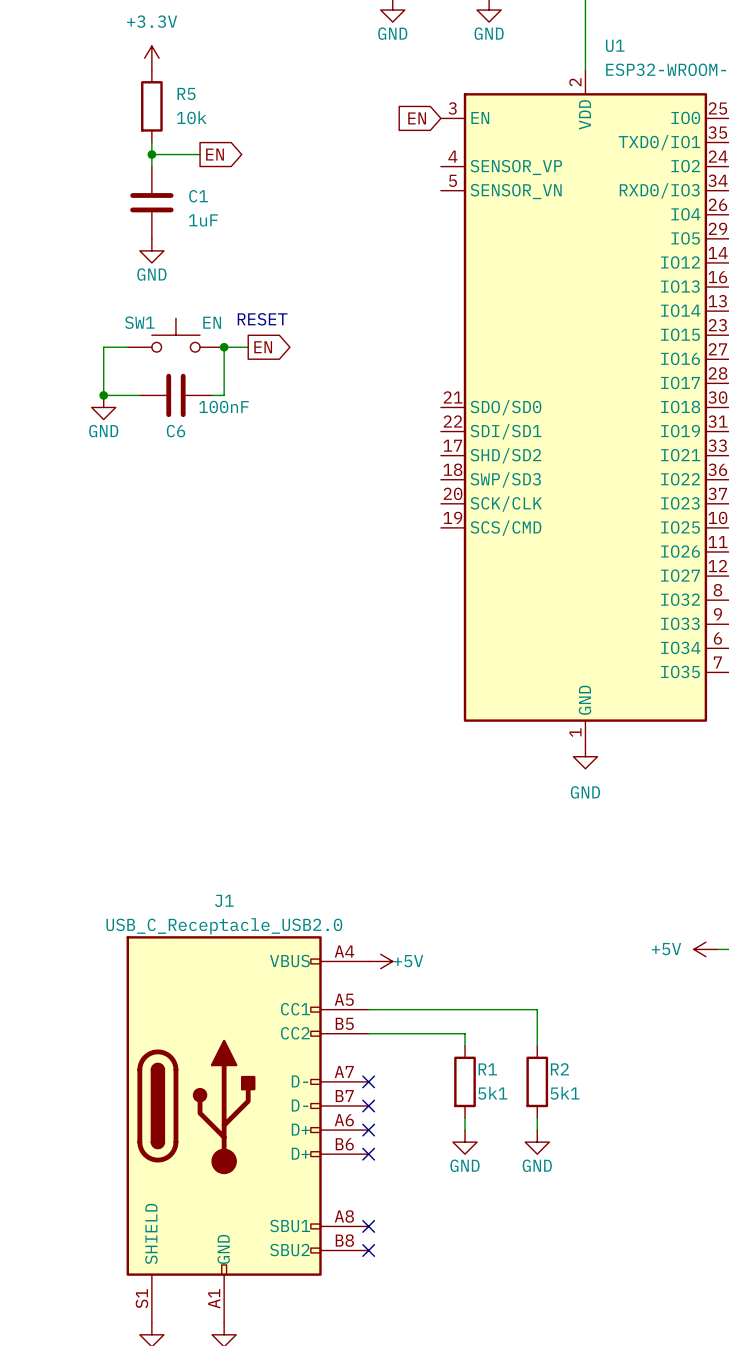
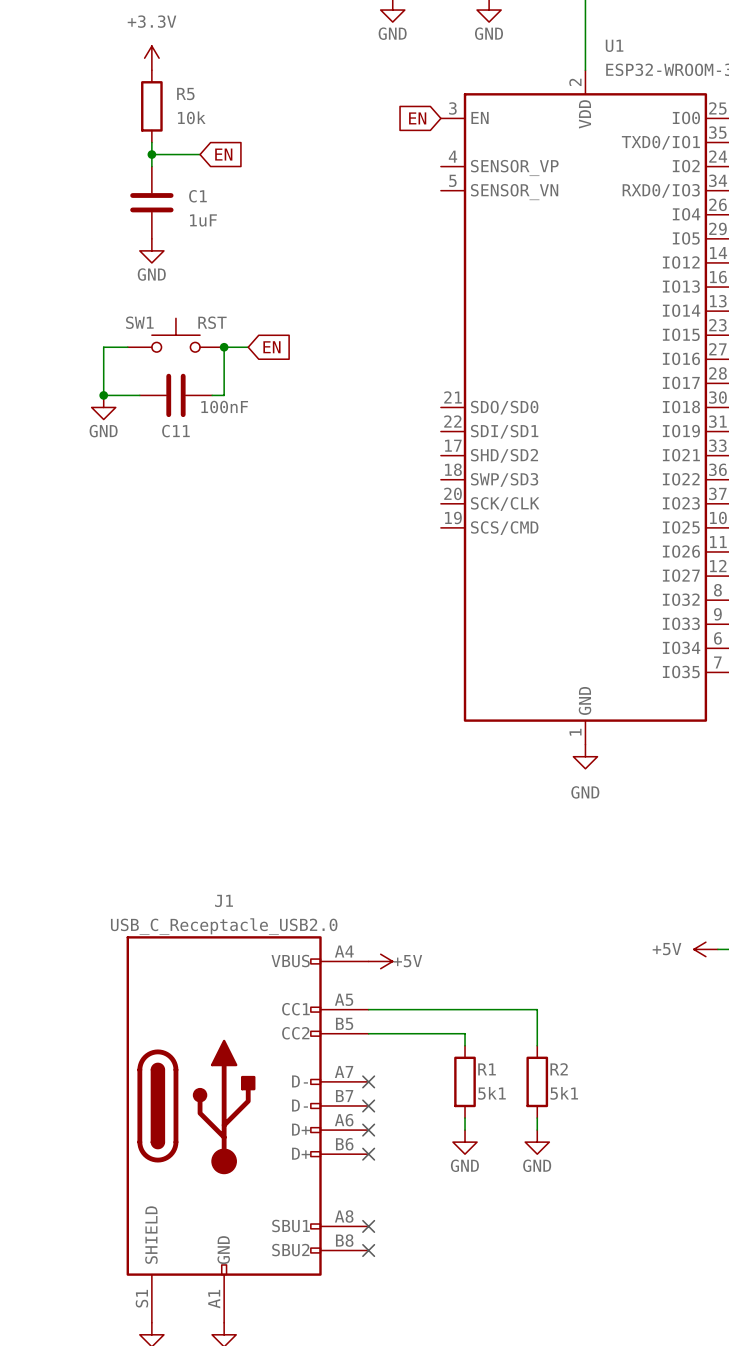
global label shape: output (215, 154) -> input (223, 154)
text: RESET (262, 319) -> none
SW1 value: EN (212, 322) -> RST (212, 322)
global label shape: output (263, 347) -> input (271, 347)
C6 name: C6 (176, 431) -> C11 (175, 431)

